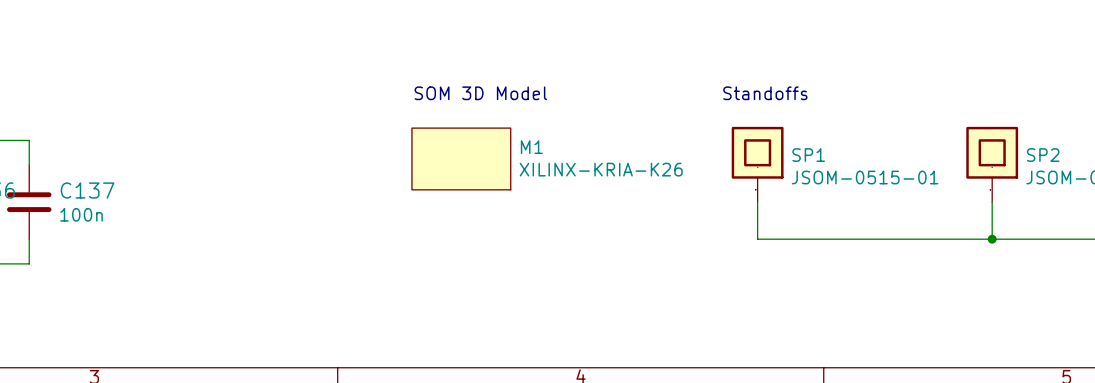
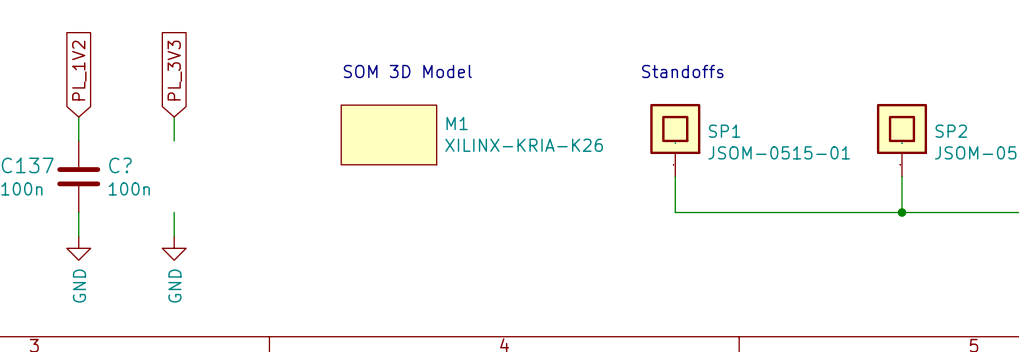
global label: none -> PL_1V2 (79, 70)
global label: none -> PL_3V3 (174, 70)
wire: none -> (78, 117) (78, 140)
wire: none -> (174, 117) (174, 140)
C?: none -> (78, 176)
wire: none -> (78, 212) (78, 236)
wire: none -> (174, 212) (174, 236)
power symbol: none -> GND (78, 248)
power symbol: none -> GND (174, 248)

